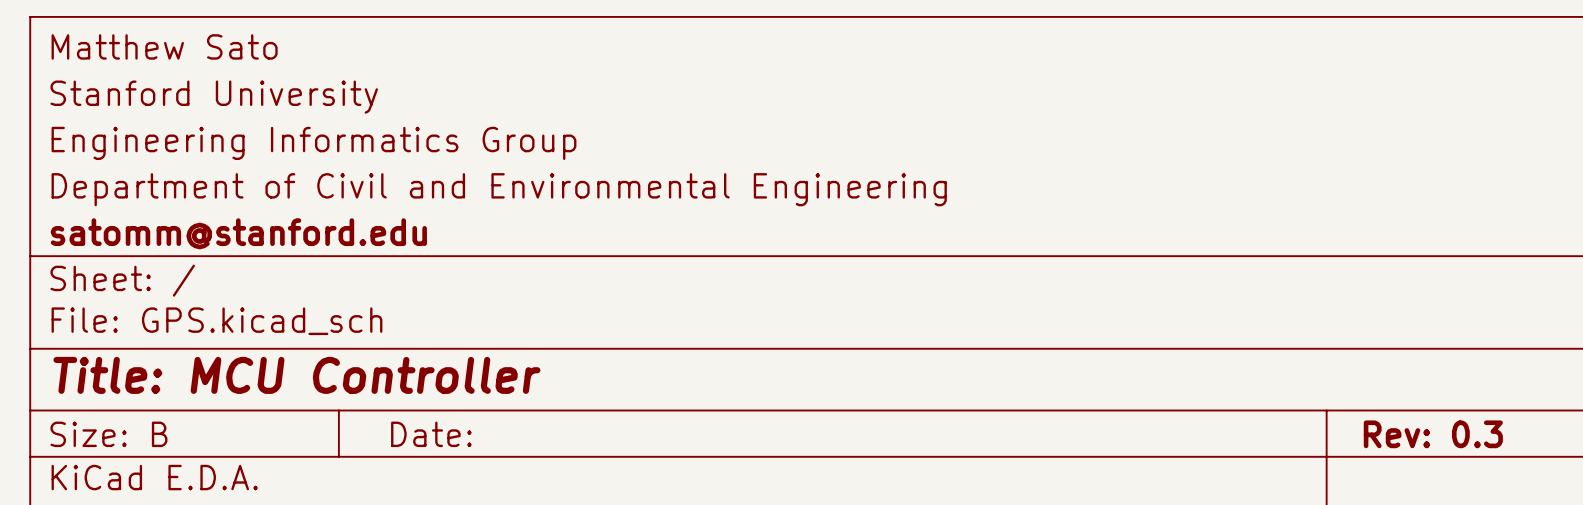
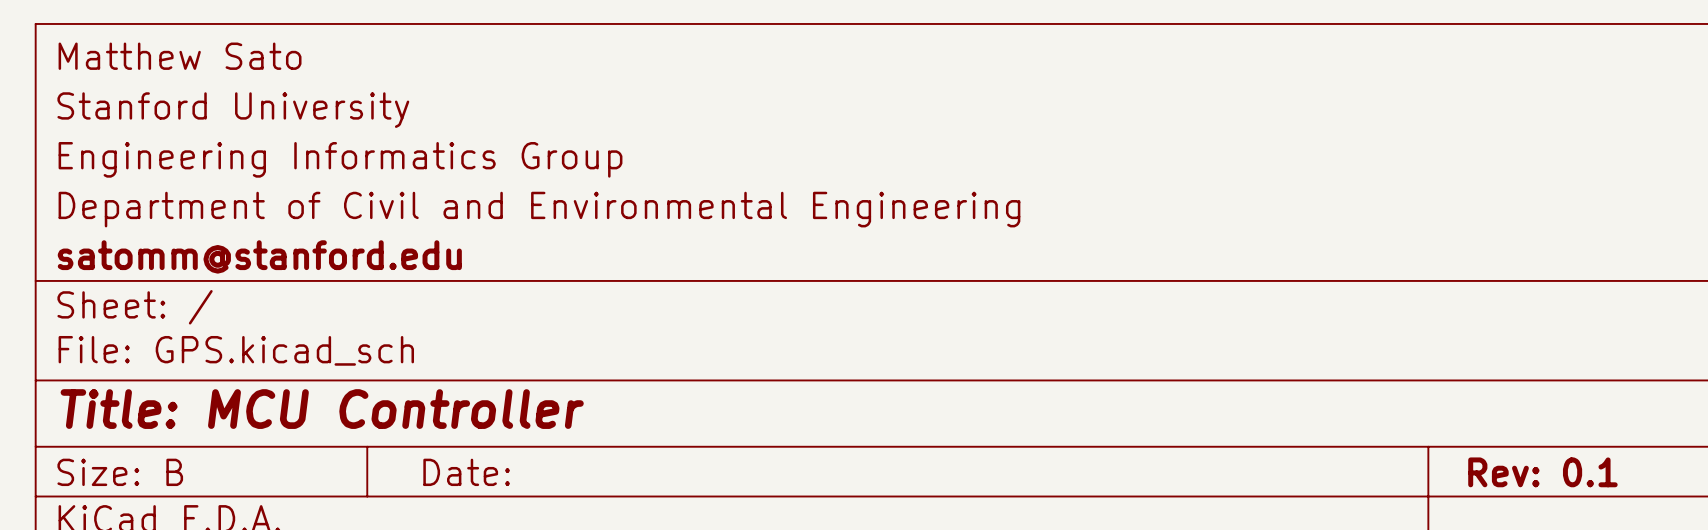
title block: Rev: 0.3 (1433, 434) -> Rev: 0.1 (1542, 472)

